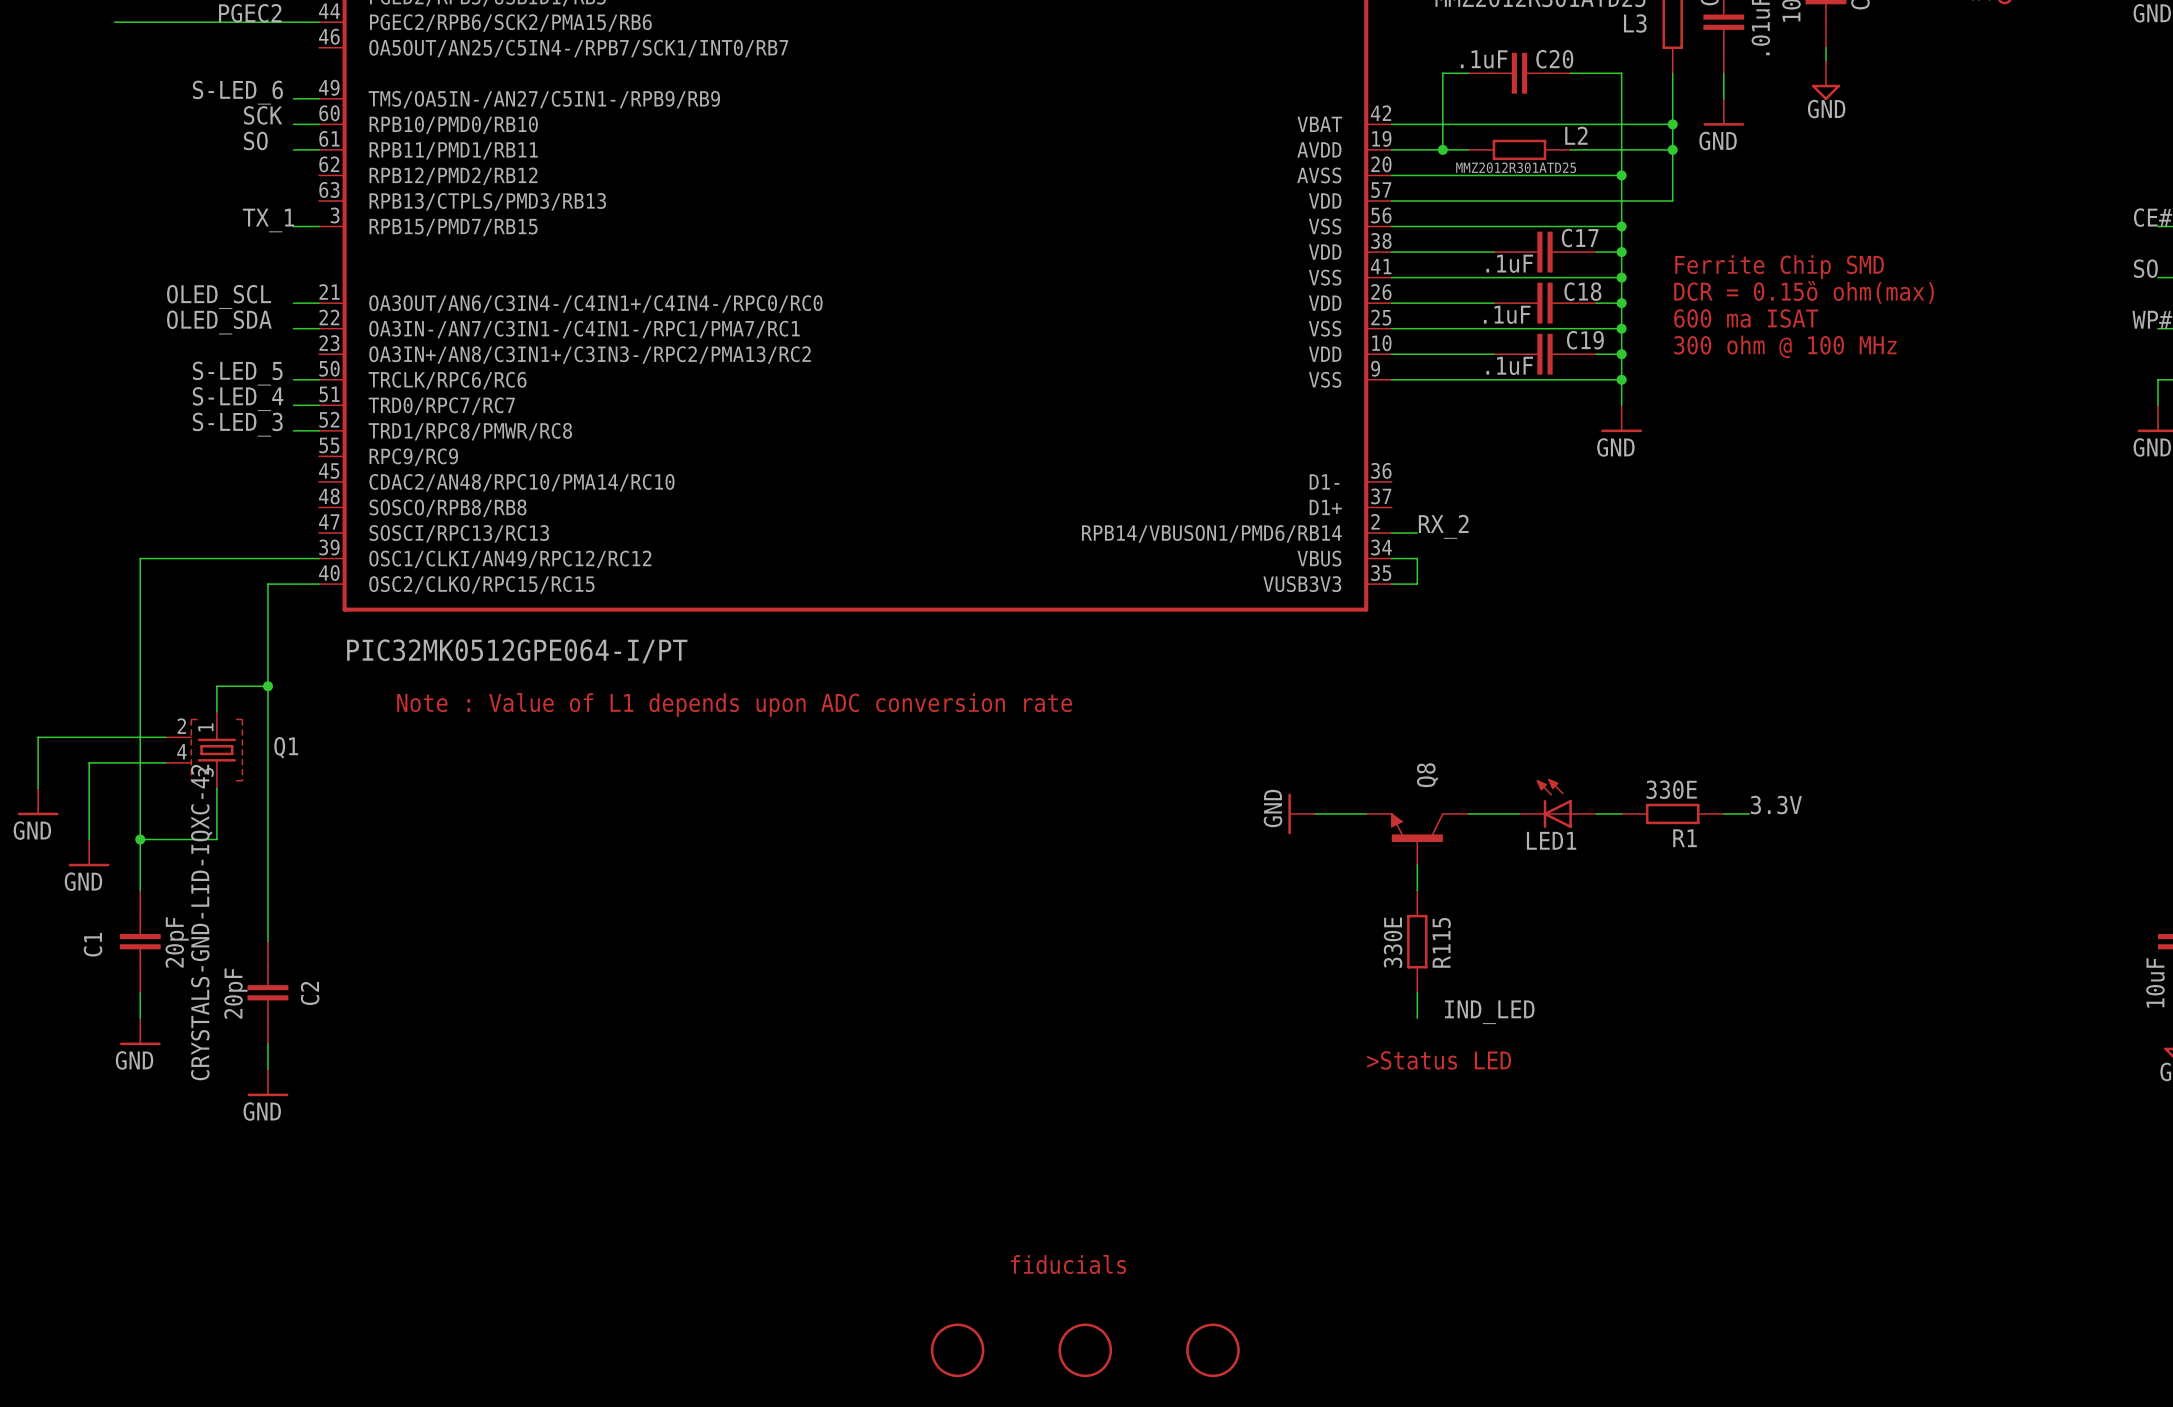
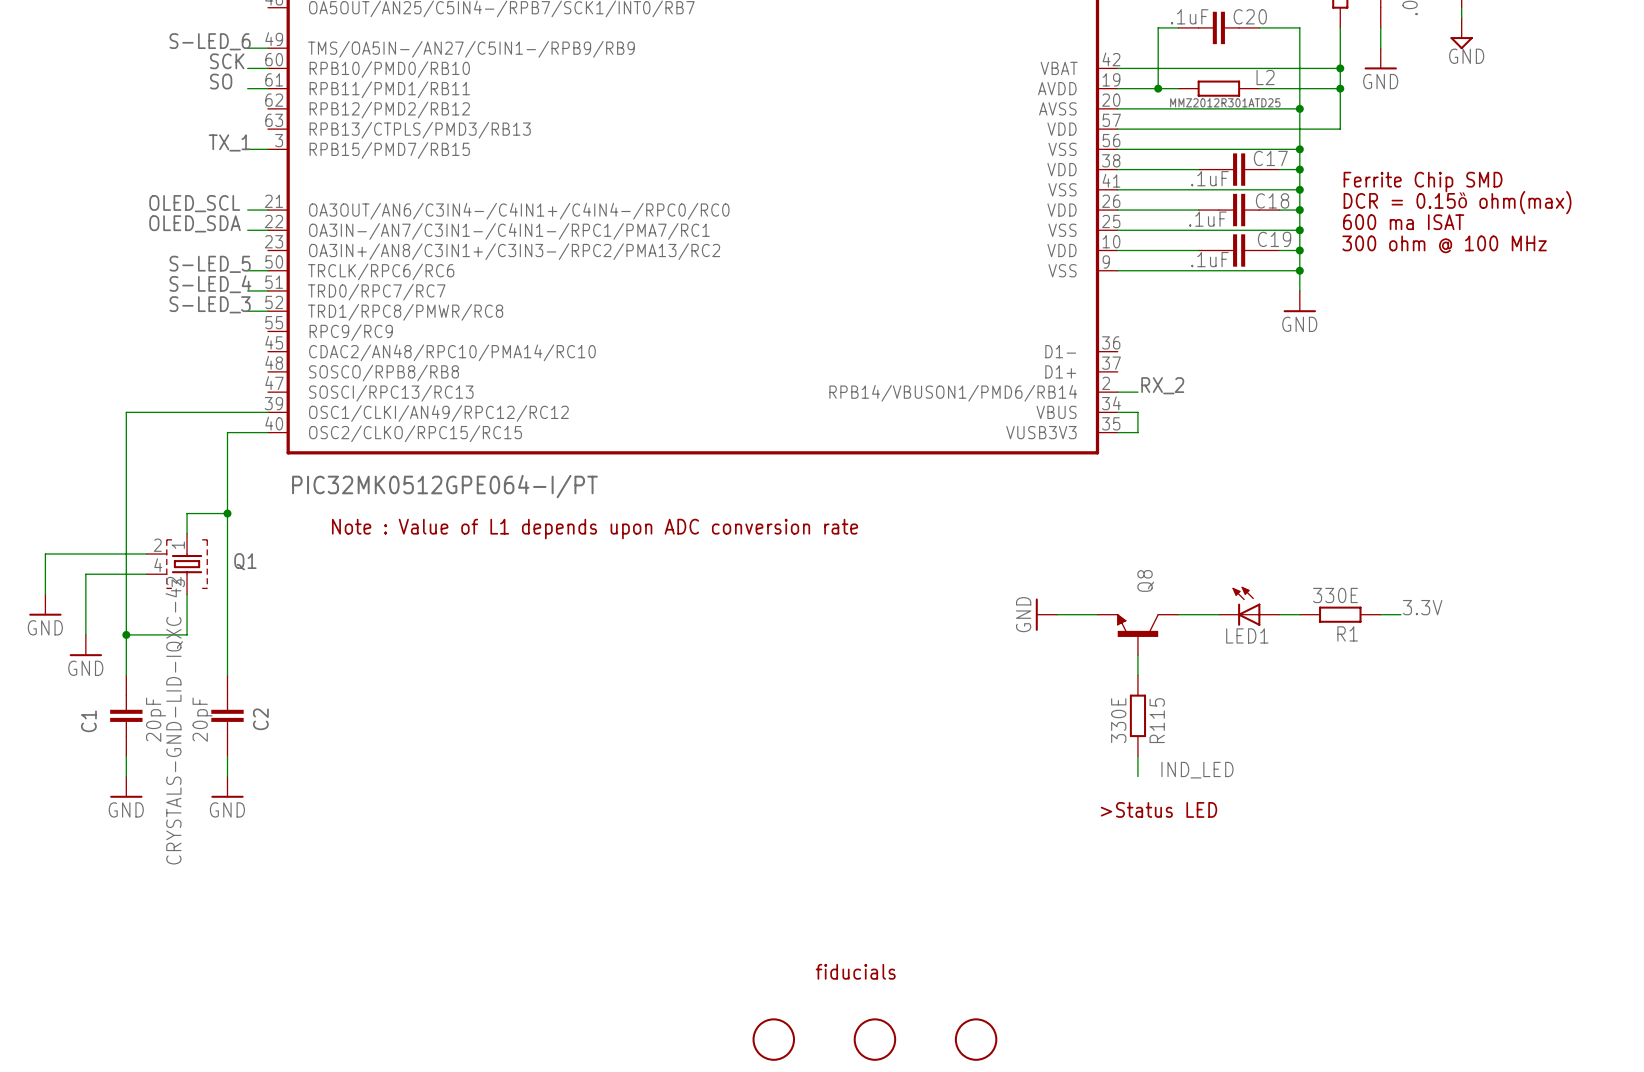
C2 position: (267, 992) -> (227, 715)
power symbol position: GND (267, 1082) -> GND (227, 787)

